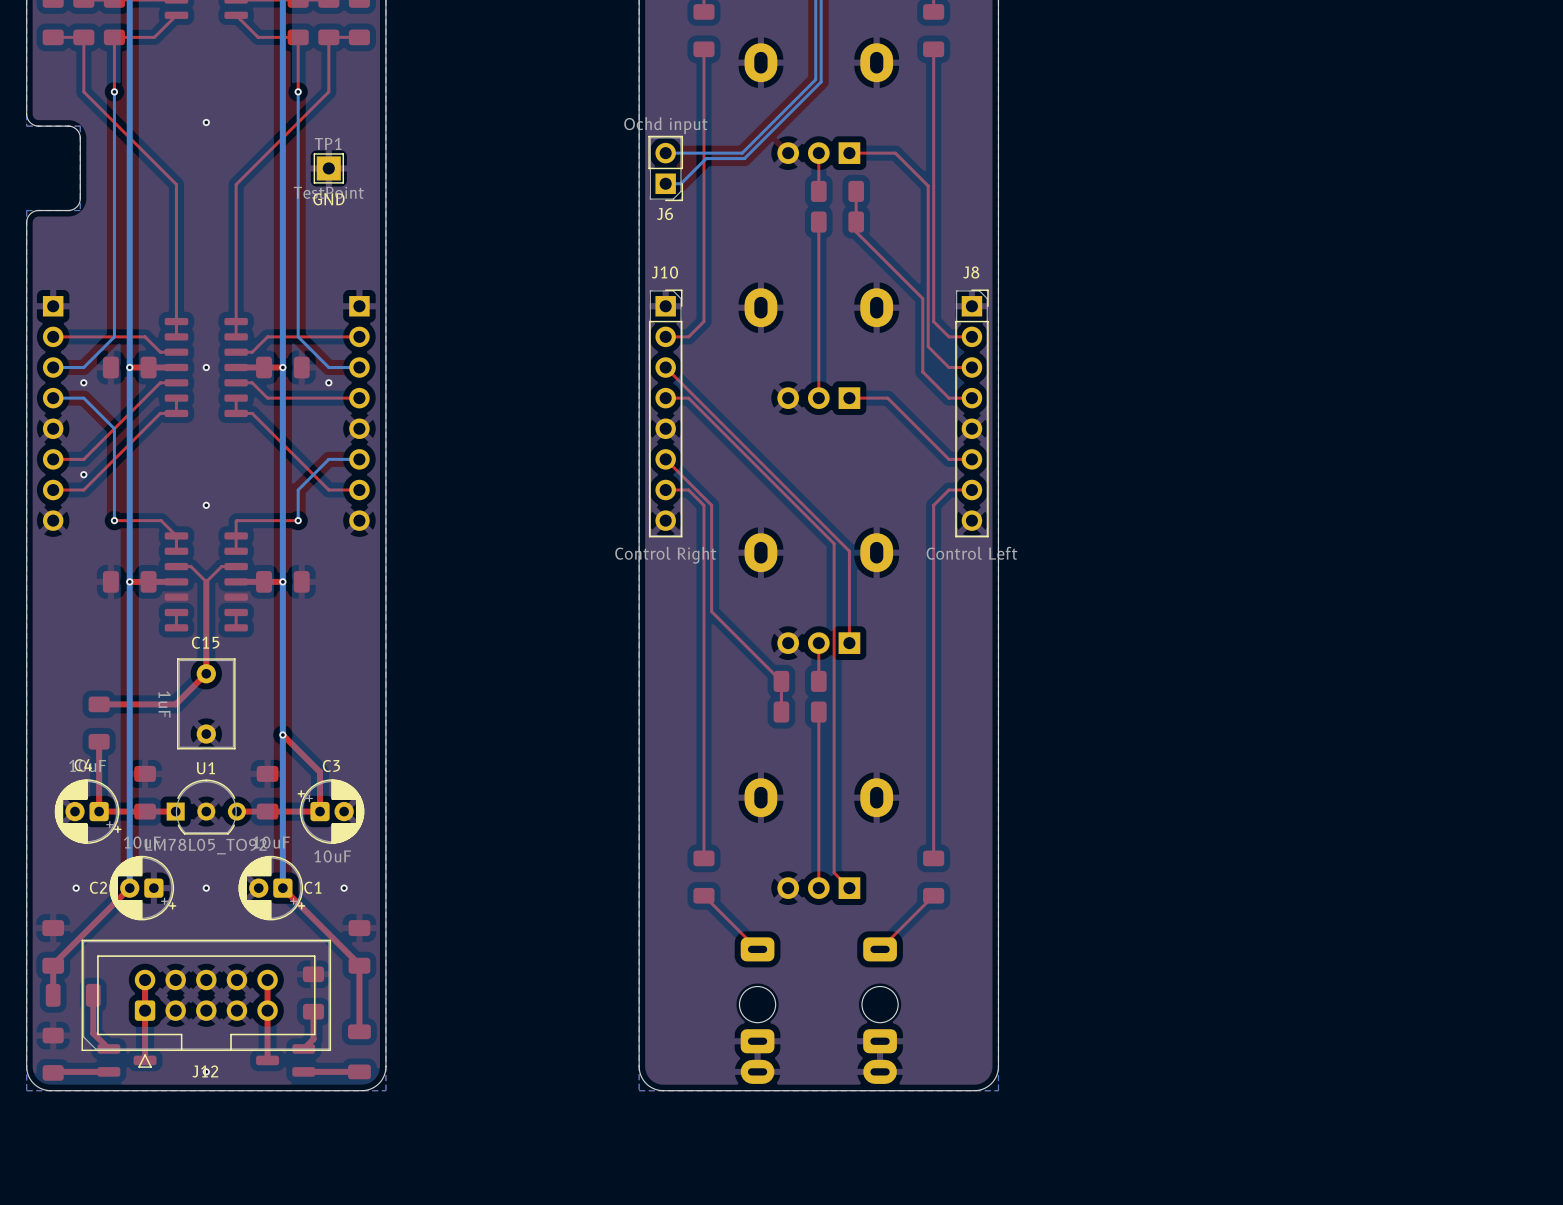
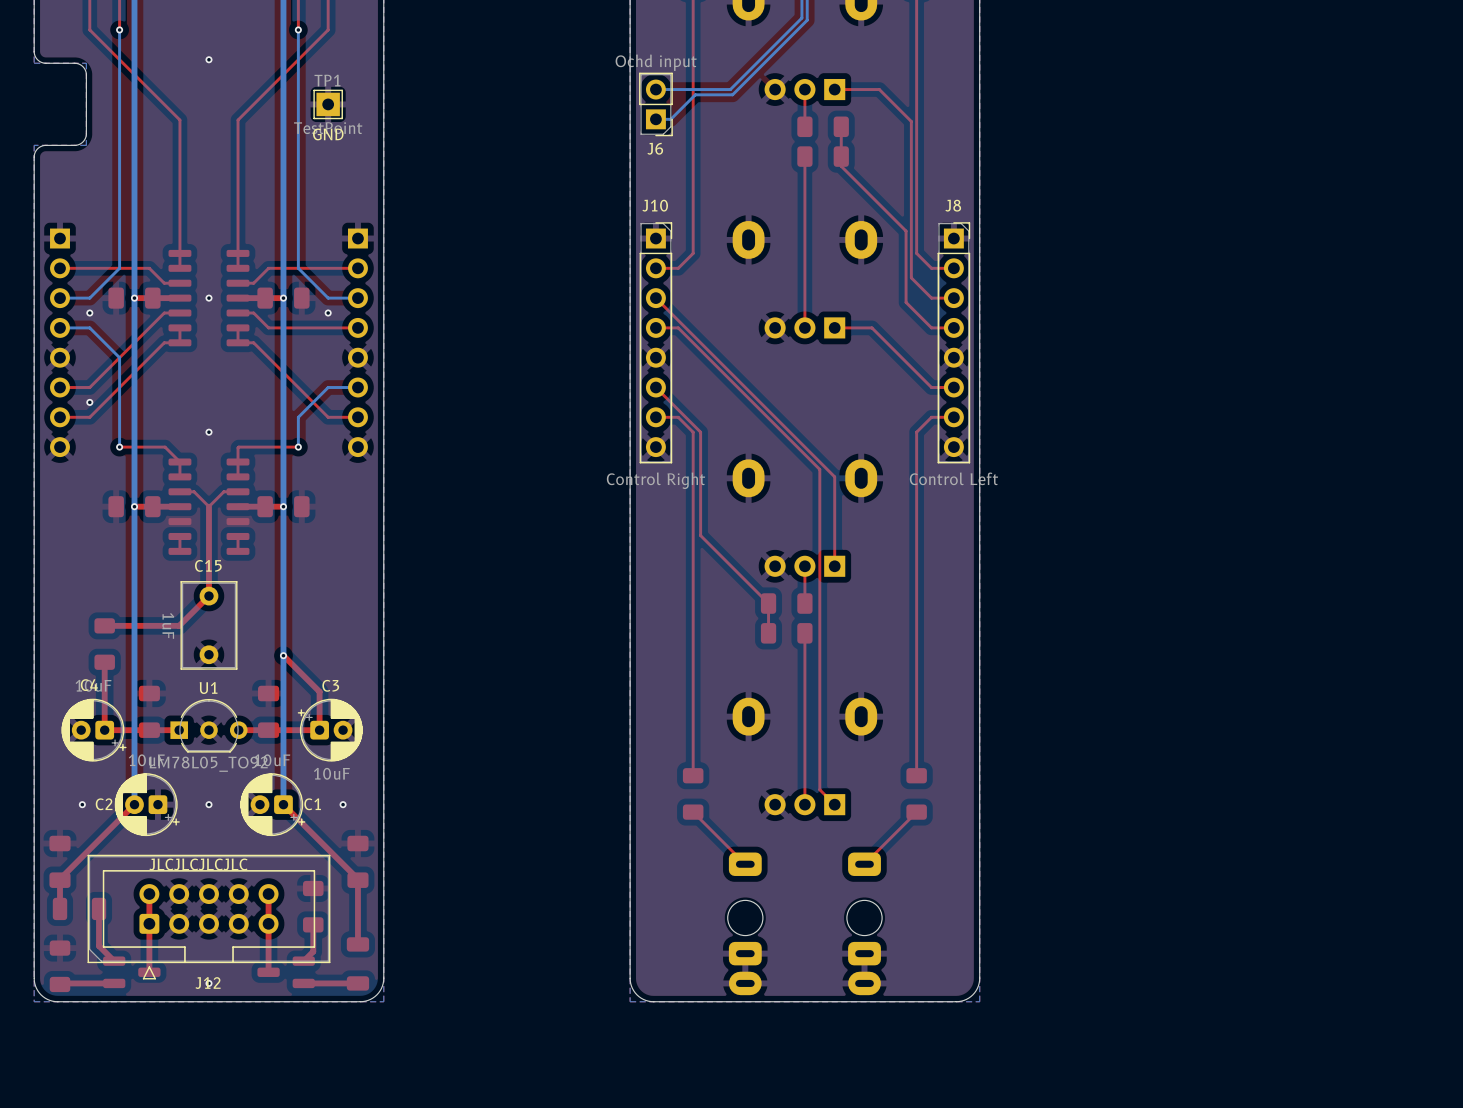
text: none -> JLCJLCJLCJLC (198, 864)

